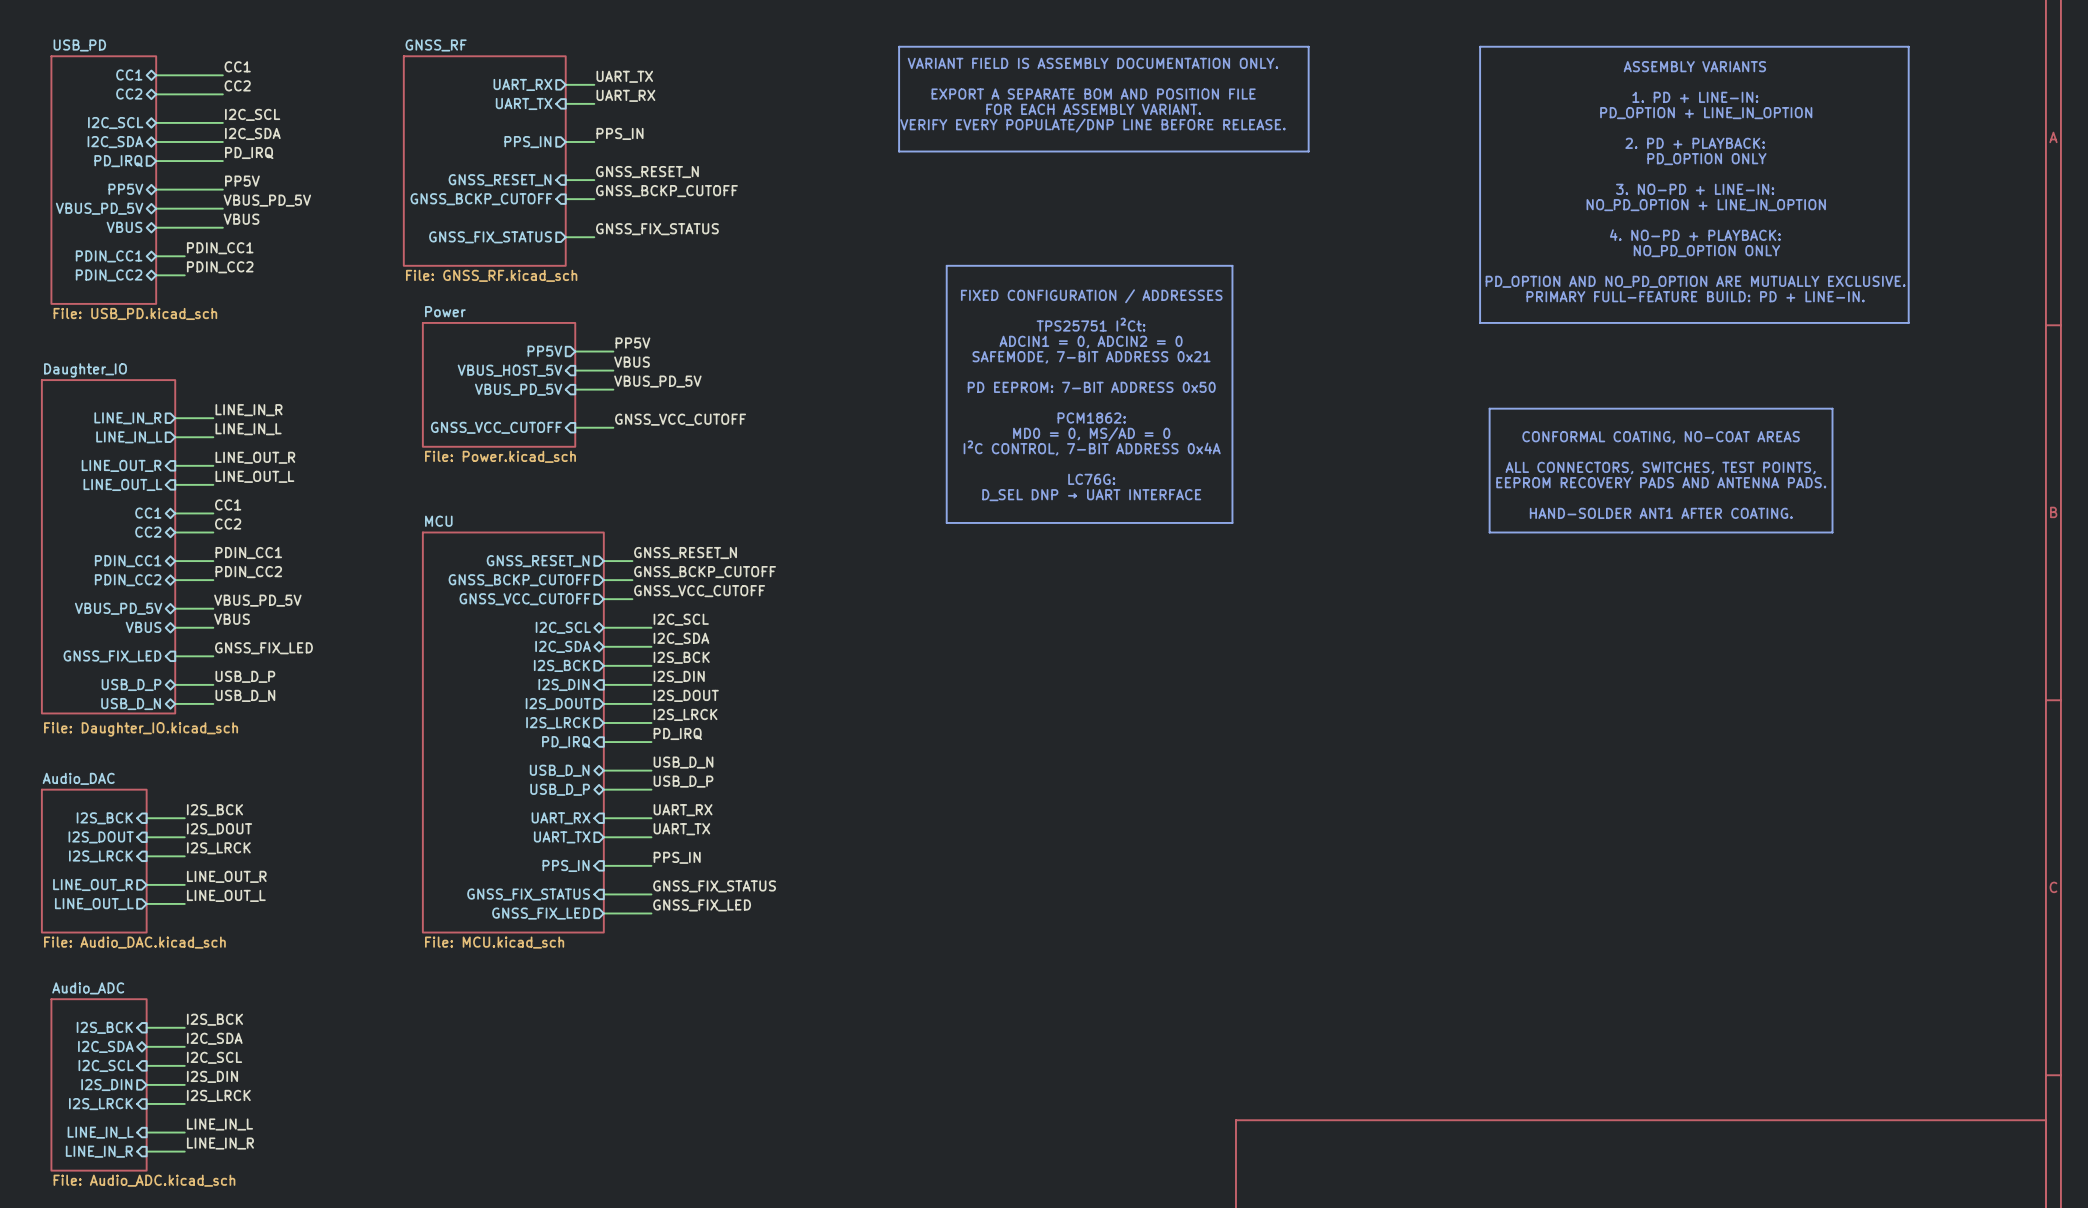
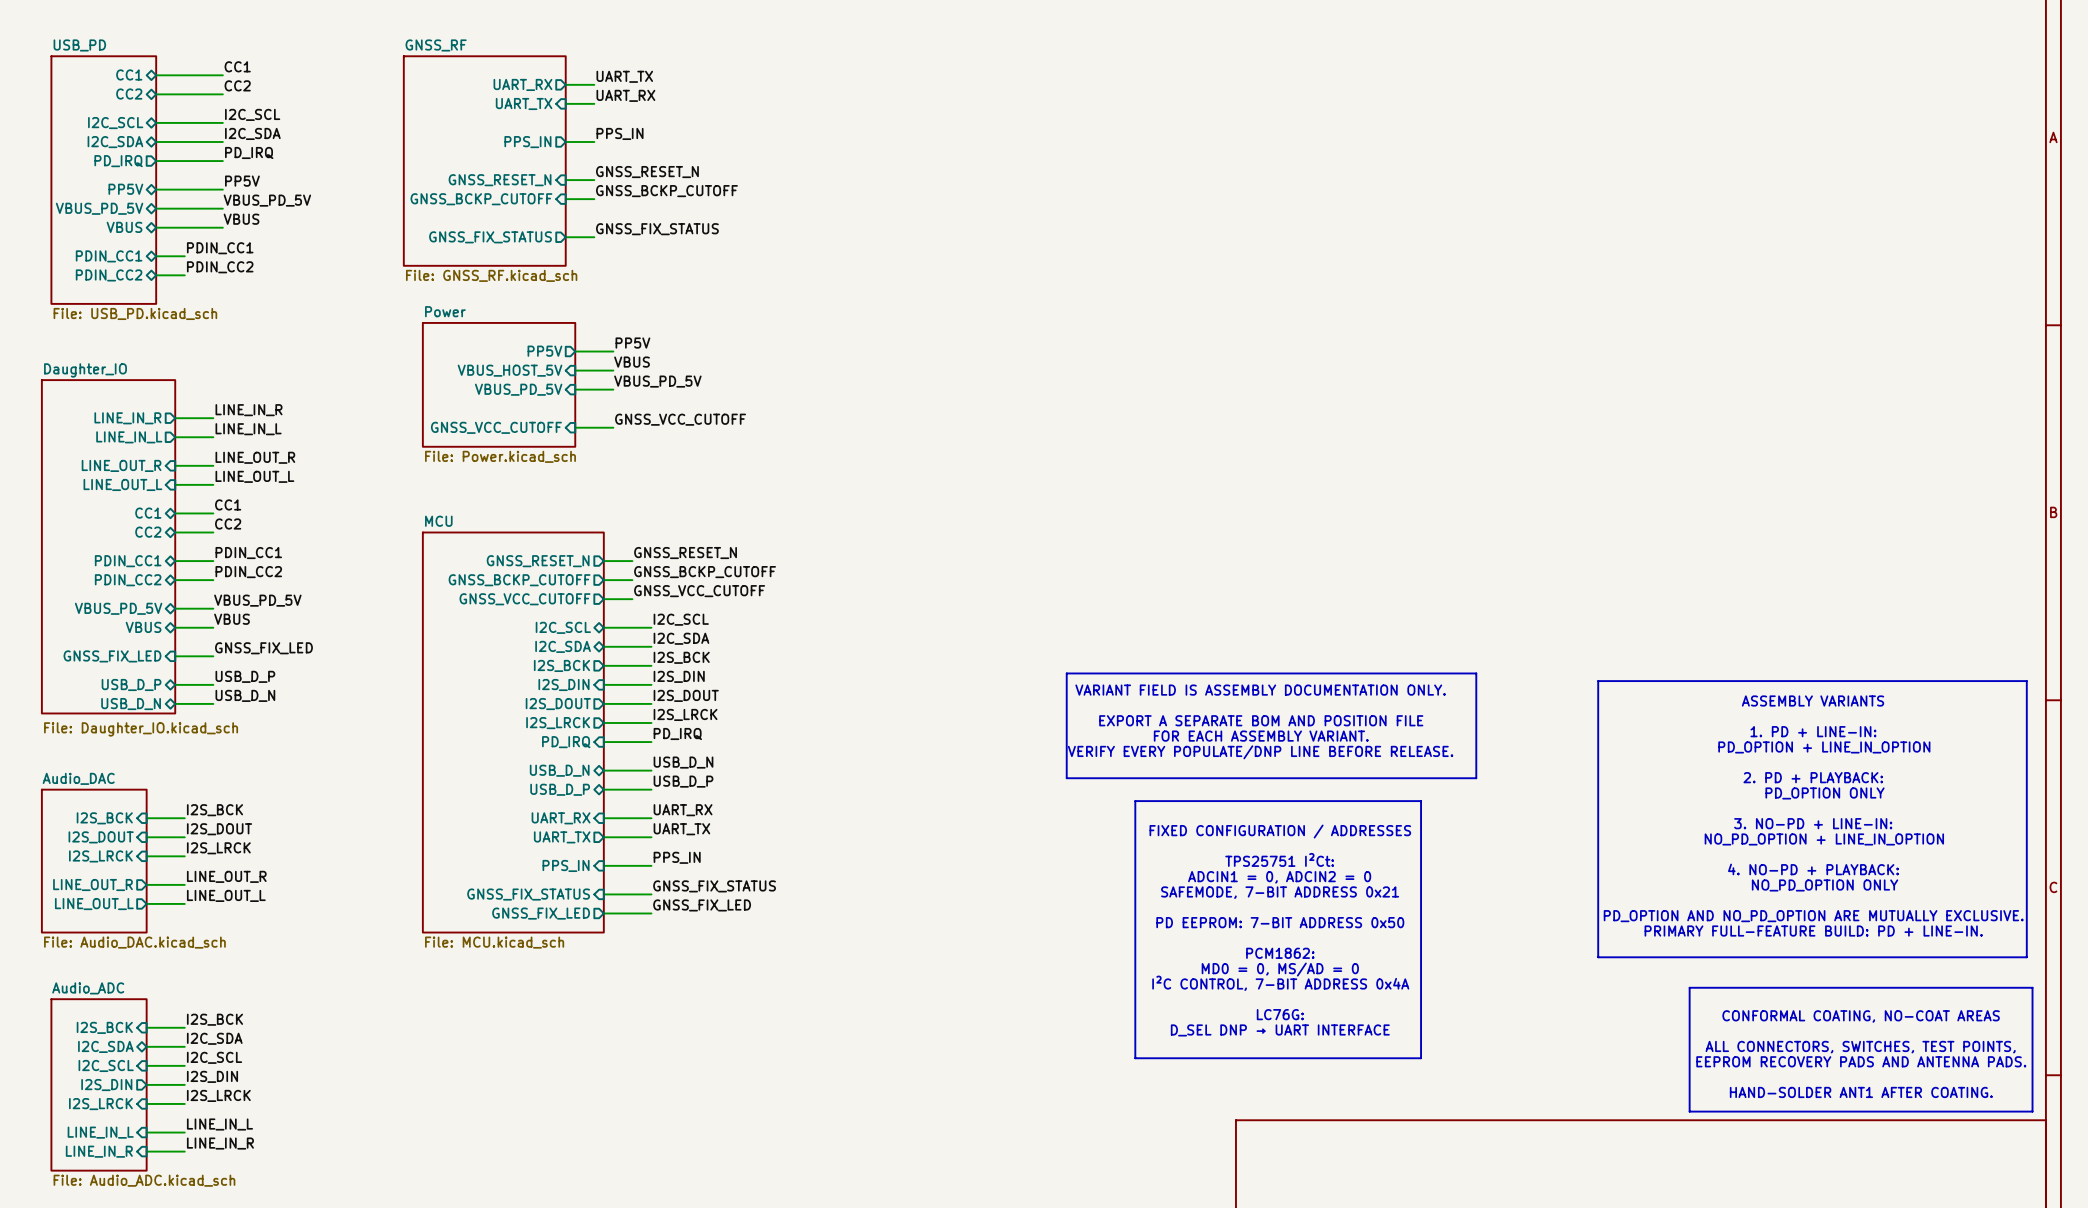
line: (899, 46) (1308, 46) (1308, 151) (899, 151) (899, 46) -> none
line: (1480, 46) (1908, 46) (1908, 322) (1480, 322) (1480, 46) -> none
text: VARIANT FIELD IS ASSEMBLY DOCUMENTATION ONLY. (1092, 63) -> none
text: ASSEMBLY VARIANTS (1694, 66) -> none
text: EXPORT A SEPARATE BOM AND POSITION FILE (1093, 94) -> none
text: 1. PD + LINE-IN: (1695, 97) -> none
text: FOR EACH ASSEMBLY VARIANT. (1093, 109) -> none
text: PD_OPTION + LINE_IN_OPTION (1706, 113) -> none
text: VERIFY EVERY POPULATE/DNP LINE BEFORE RELEASE. (1092, 125) -> none
text: 2. PD + PLAYBACK: (1695, 143) -> none
text: PD_OPTION ONLY (1706, 159) -> none
text: 3. NO-PD + LINE-IN: (1695, 189) -> none
text: NO_PD_OPTION + LINE_IN_OPTION (1706, 205) -> none
text: 4. NO-PD + PLAYBACK: (1695, 235) -> none
text: NO_PD_OPTION ONLY (1706, 251) -> none
line: (946, 265) (1232, 265) (1232, 522) (946, 522) (946, 265) -> none
text: PD_OPTION AND NO_PD_OPTION ARE MUTUALLY EXCLUSIVE. (1695, 281) -> none
text: FIXED CONFIGURATION / ADDRESSES (1091, 296) -> none
text: PRIMARY FULL-FEATURE BUILD: PD + LINE-IN. (1695, 296) -> none
text: TPS25751 I²Ct: (1091, 324) -> none
text: ADCIN1 = 0, ADCIN2 = 0 (1091, 342) -> none
text: SAFEMODE, 7-BIT ADDRESS 0x21 (1091, 357) -> none
text: PD EEPROM: 7-BIT ADDRESS 0x50 (1091, 387) -> none
line: (1489, 408) (1832, 408) (1832, 532) (1489, 532) (1489, 408) -> none
text: PCM1862: (1091, 418) -> none
text: MD0 = 0, MS/AD = 0 (1091, 434) -> none
text: CONFORMAL COATING, NO-COAT AREAS (1661, 437) -> none
text: I²C CONTROL, 7-BIT ADDRESS 0x4A (1092, 448) -> none
text: ALL CONNECTORS, SWITCHES, TEST POINTS, (1660, 468) -> none
text: LC76G: (1091, 479) -> none
text: EEPROM RECOVERY PADS AND ANTENNA PADS. (1661, 482) -> none
text: D_SEL DNP → UART INTERFACE (1091, 495) -> none
text: HAND-SOLDER ANT1 AFTER COATING. (1661, 513) -> none
line: none -> (1066, 673) (1476, 673) (1476, 778) (1066, 778) (1066, 673)
line: none -> (1598, 681) (2026, 681) (2026, 957) (1598, 957) (1598, 681)
text: none -> VARIANT FIELD IS ASSEMBLY DOCUMENTATION ONLY. (1260, 690)
text: none -> ASSEMBLY VARIANTS (1813, 700)
text: none -> EXPORT A SEPARATE BOM AND POSITION FILE (1261, 720)
text: none -> 1. PD + LINE-IN: (1813, 731)
text: none -> FOR EACH ASSEMBLY VARIANT. (1261, 736)
text: none -> PD_OPTION + LINE_IN_OPTION (1824, 747)
text: none -> VERIFY EVERY POPULATE/DNP LINE BEFORE RELEASE. (1260, 752)
text: none -> 2. PD + PLAYBACK: (1813, 777)
text: none -> PD_OPTION ONLY (1825, 793)
line: none -> (1135, 801) (1421, 801) (1421, 1058) (1135, 1058) (1135, 801)
text: none -> 3. NO-PD + LINE-IN: (1813, 823)
text: none -> FIXED CONFIGURATION / ADDRESSES (1280, 831)
text: none -> NO_PD_OPTION + LINE_IN_OPTION (1824, 839)
text: none -> TPS25751 I²Ct: (1279, 859)
text: none -> 4. NO-PD + PLAYBACK: (1813, 869)
text: none -> ADCIN1 = 0, ADCIN2 = 0 (1279, 877)
text: none -> NO_PD_OPTION ONLY (1825, 885)
text: none -> SAFEMODE, 7-BIT ADDRESS 0x21 (1280, 892)
text: none -> PD_OPTION AND NO_PD_OPTION ARE MUTUALLY EXCLUSIVE. (1813, 916)
text: none -> PD EEPROM: 7-BIT ADDRESS 0x50 (1280, 922)
text: none -> PRIMARY FULL-FEATURE BUILD: PD + LINE-IN. (1813, 931)
text: none -> PCM1862: (1280, 953)
text: none -> MD0 = 0, MS/AD = 0 (1280, 969)
text: none -> I²C CONTROL, 7-BIT ADDRESS 0x4A (1280, 983)
line: none -> (1689, 987) (2032, 987) (2032, 1111) (1689, 1111) (1689, 987)
text: none -> LC76G: (1280, 1014)
text: none -> CONFORMAL COATING, NO-COAT AREAS (1861, 1016)
text: none -> D_SEL DNP → UART INTERFACE (1280, 1030)
text: none -> ALL CONNECTORS, SWITCHES, TEST POINTS, (1860, 1047)
text: none -> EEPROM RECOVERY PADS AND ANTENNA PADS. (1861, 1061)
text: none -> HAND-SOLDER ANT1 AFTER COATING. (1861, 1092)

